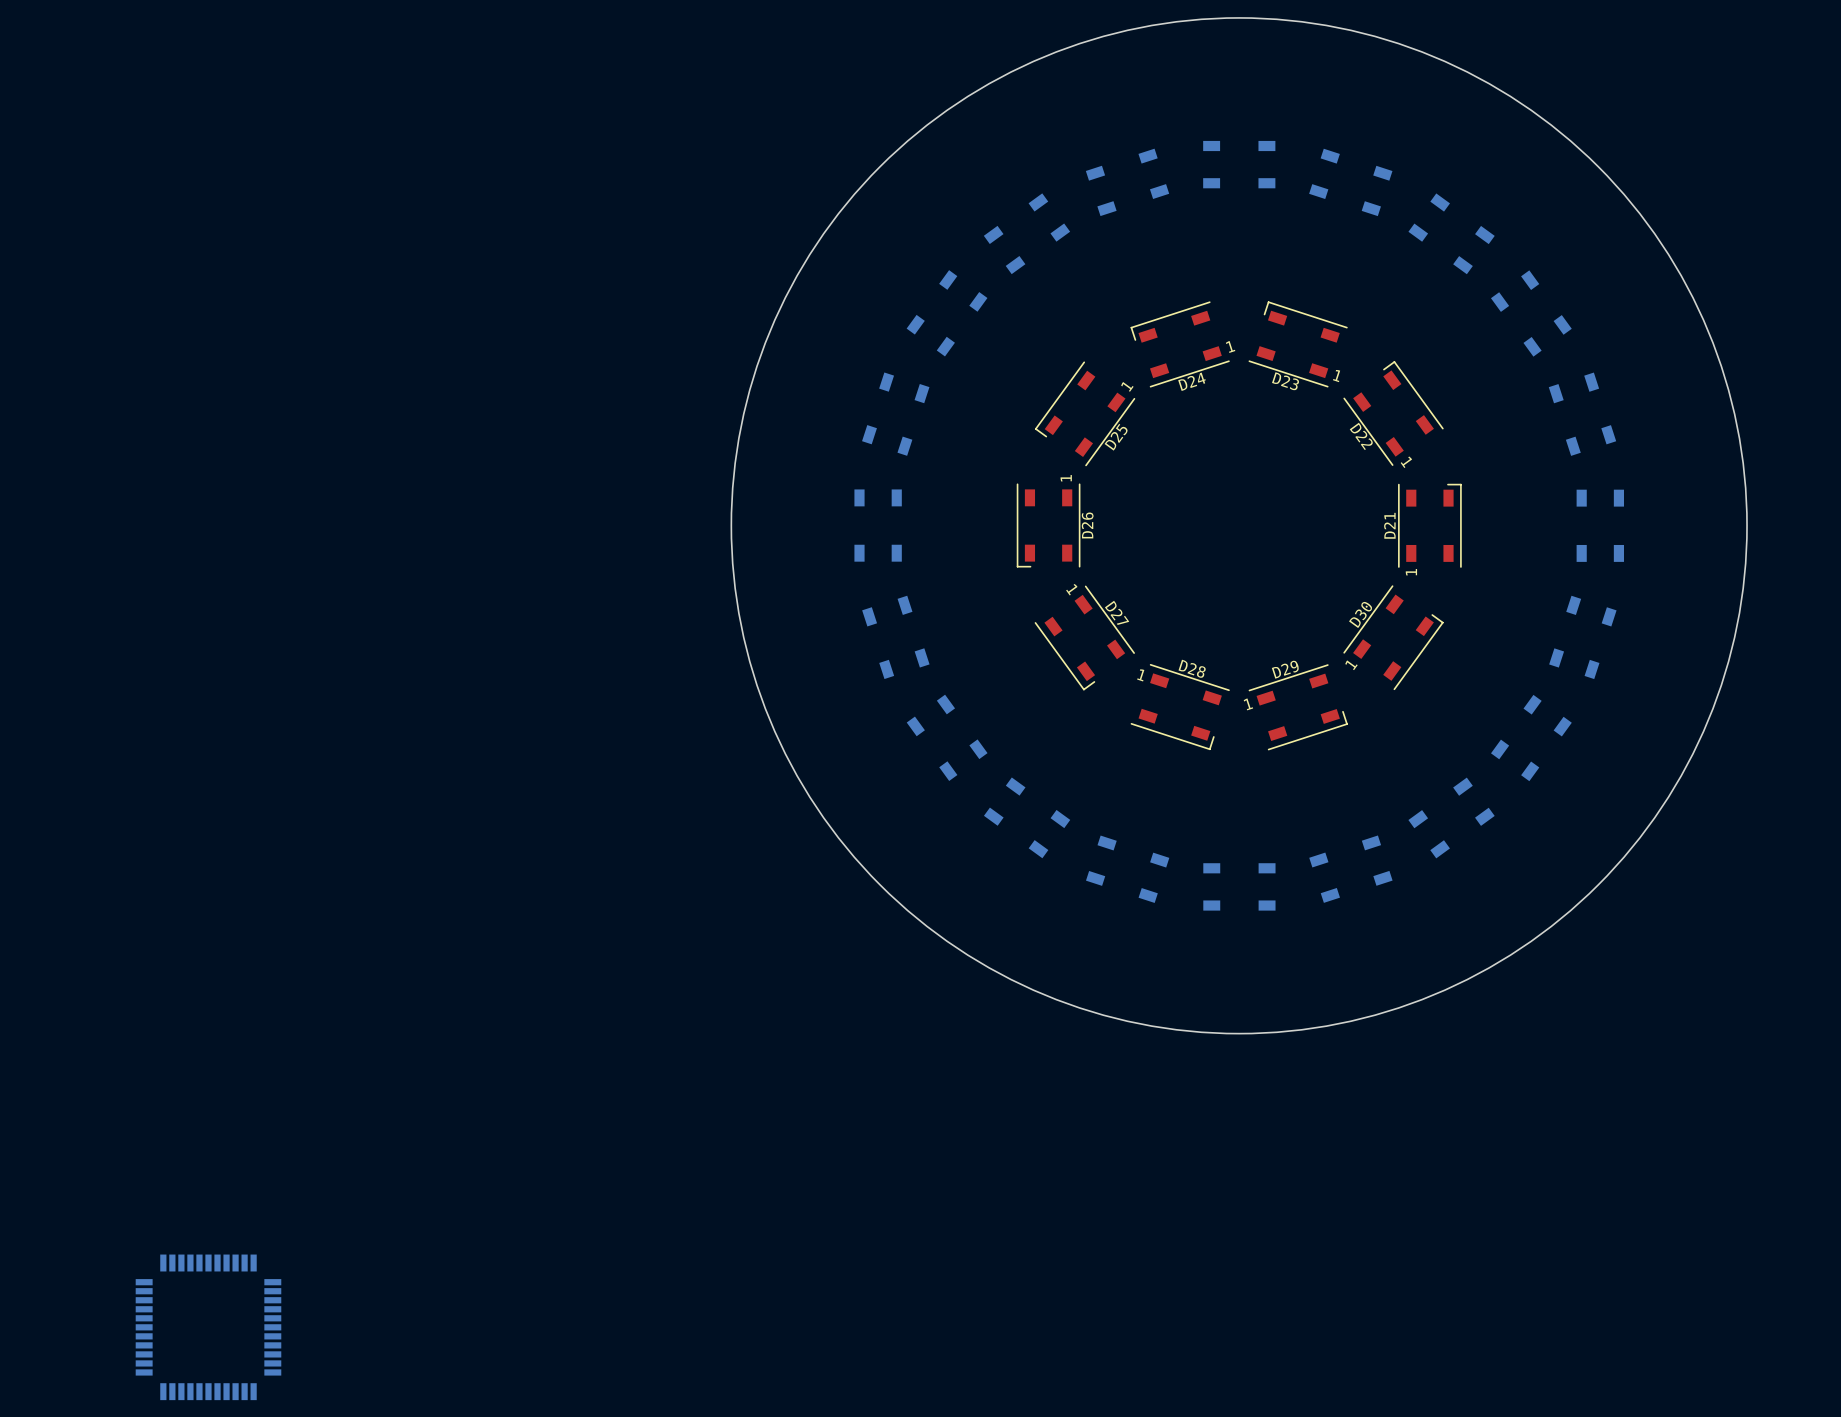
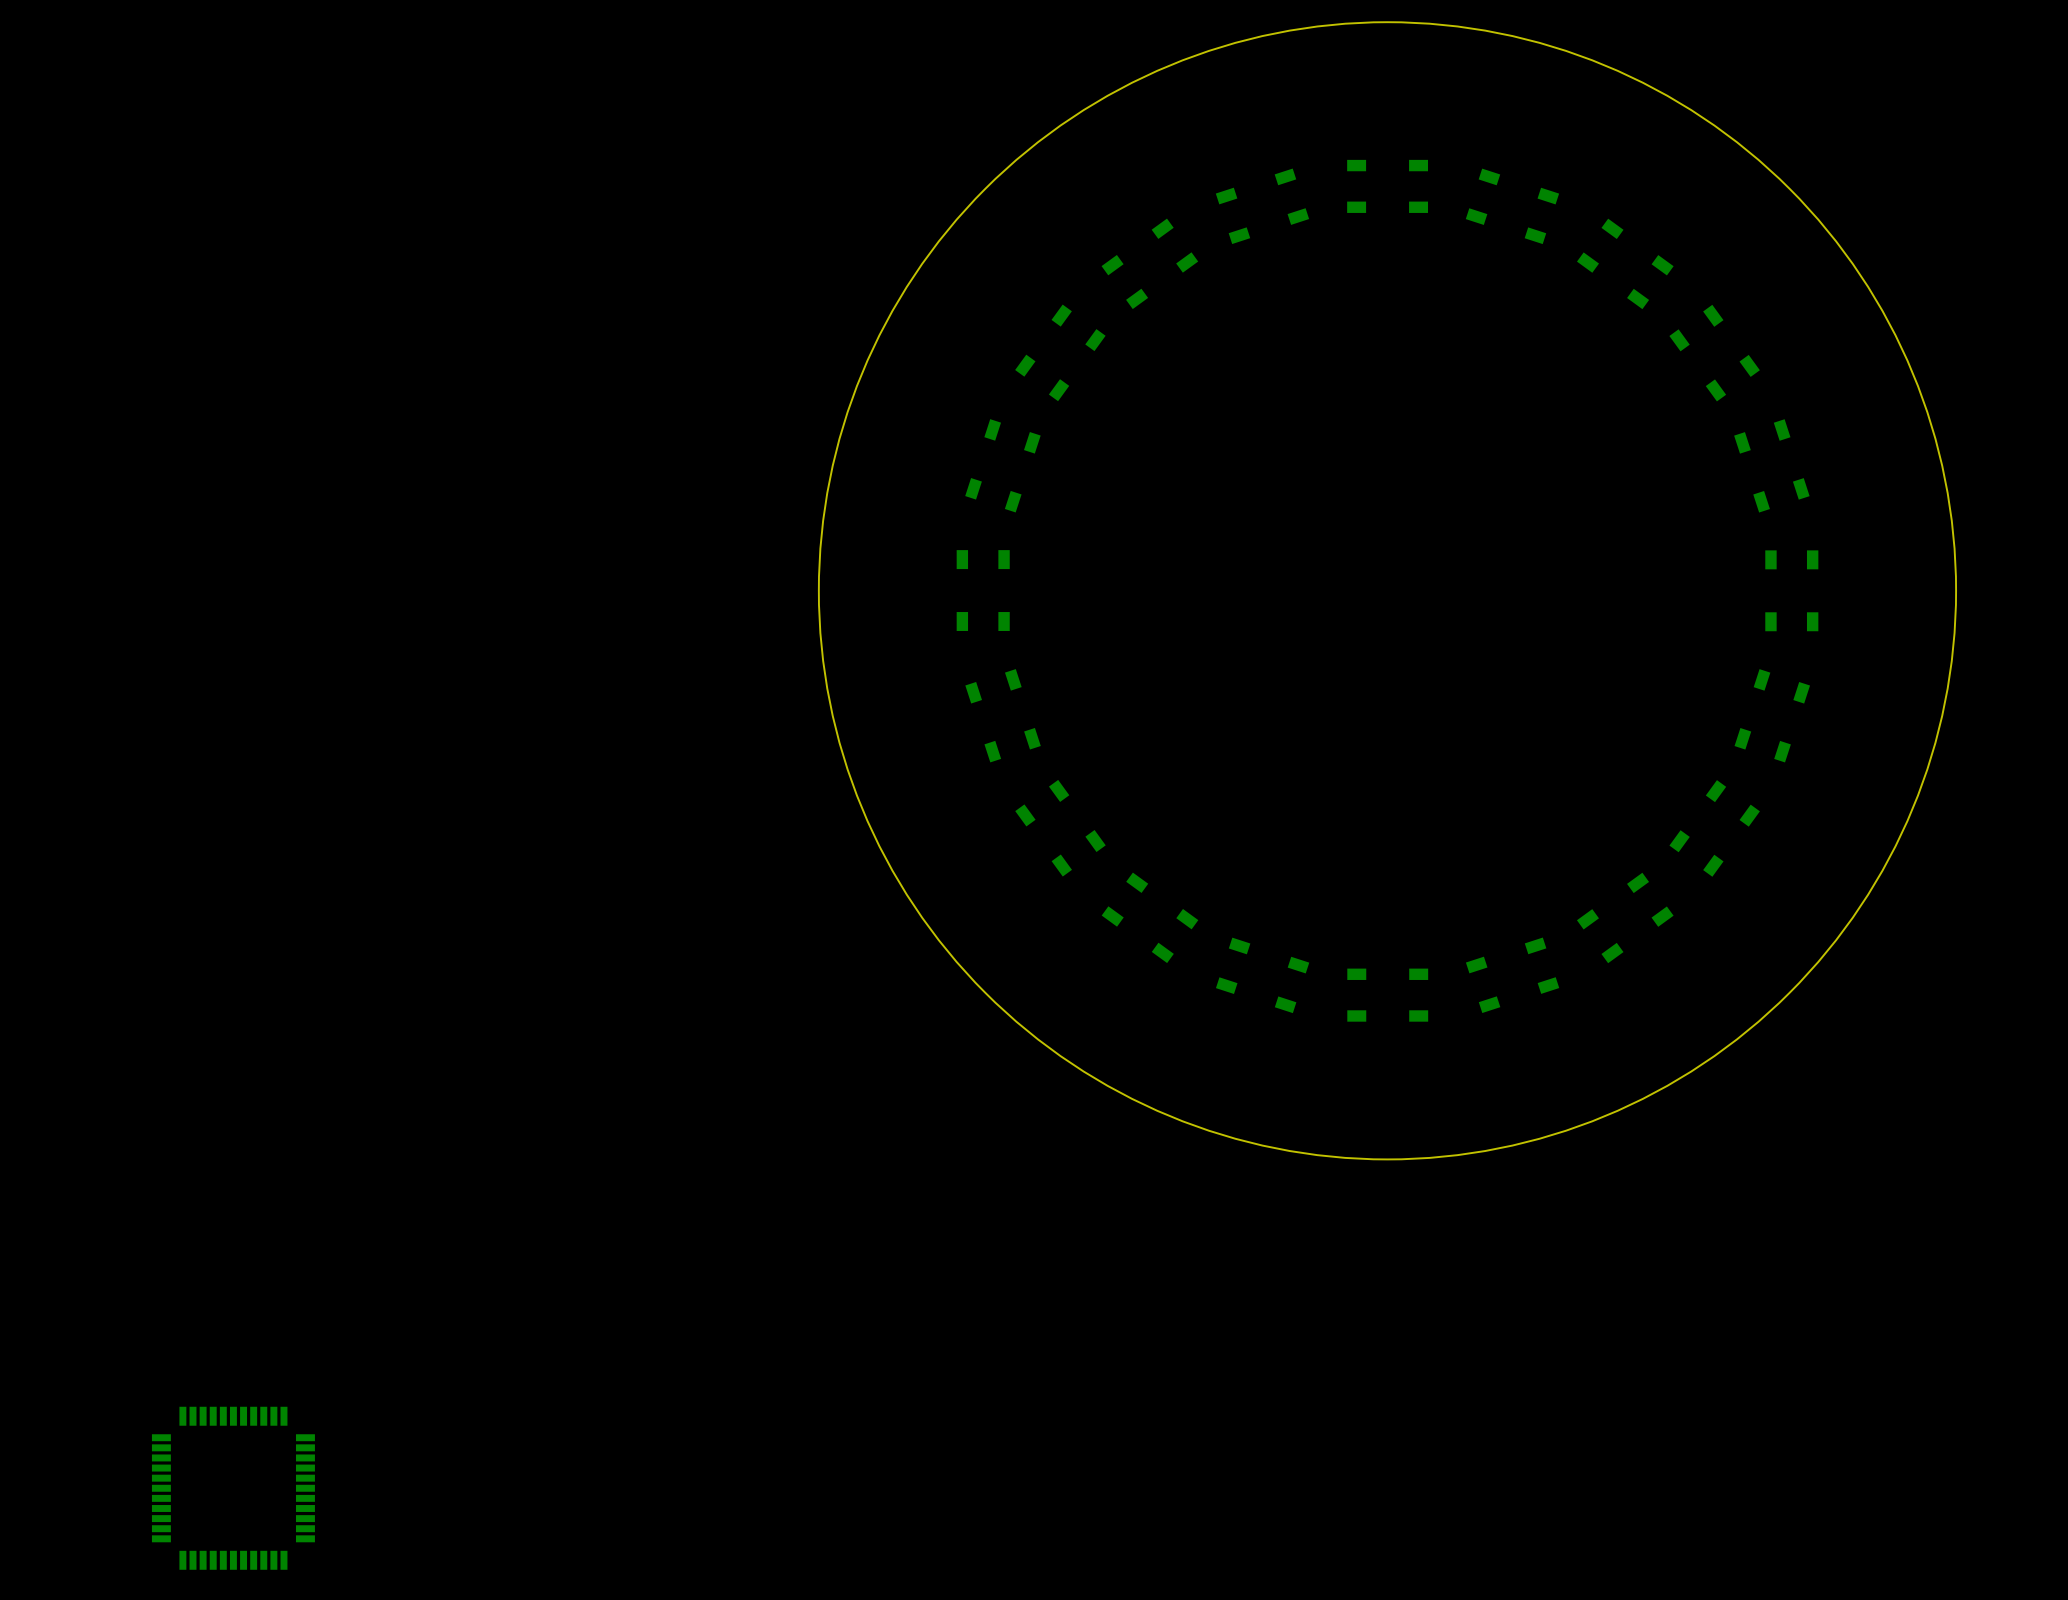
D24: (1180, 344) -> none
D23: (1298, 344) -> none
D25: (1085, 413) -> none
D22: (1393, 413) -> none
D26: (1048, 525) -> none
D21: (1429, 525) -> none
D27: (1084, 637) -> none
D30: (1393, 637) -> none
D28: (1180, 707) -> none
D29: (1298, 707) -> none

